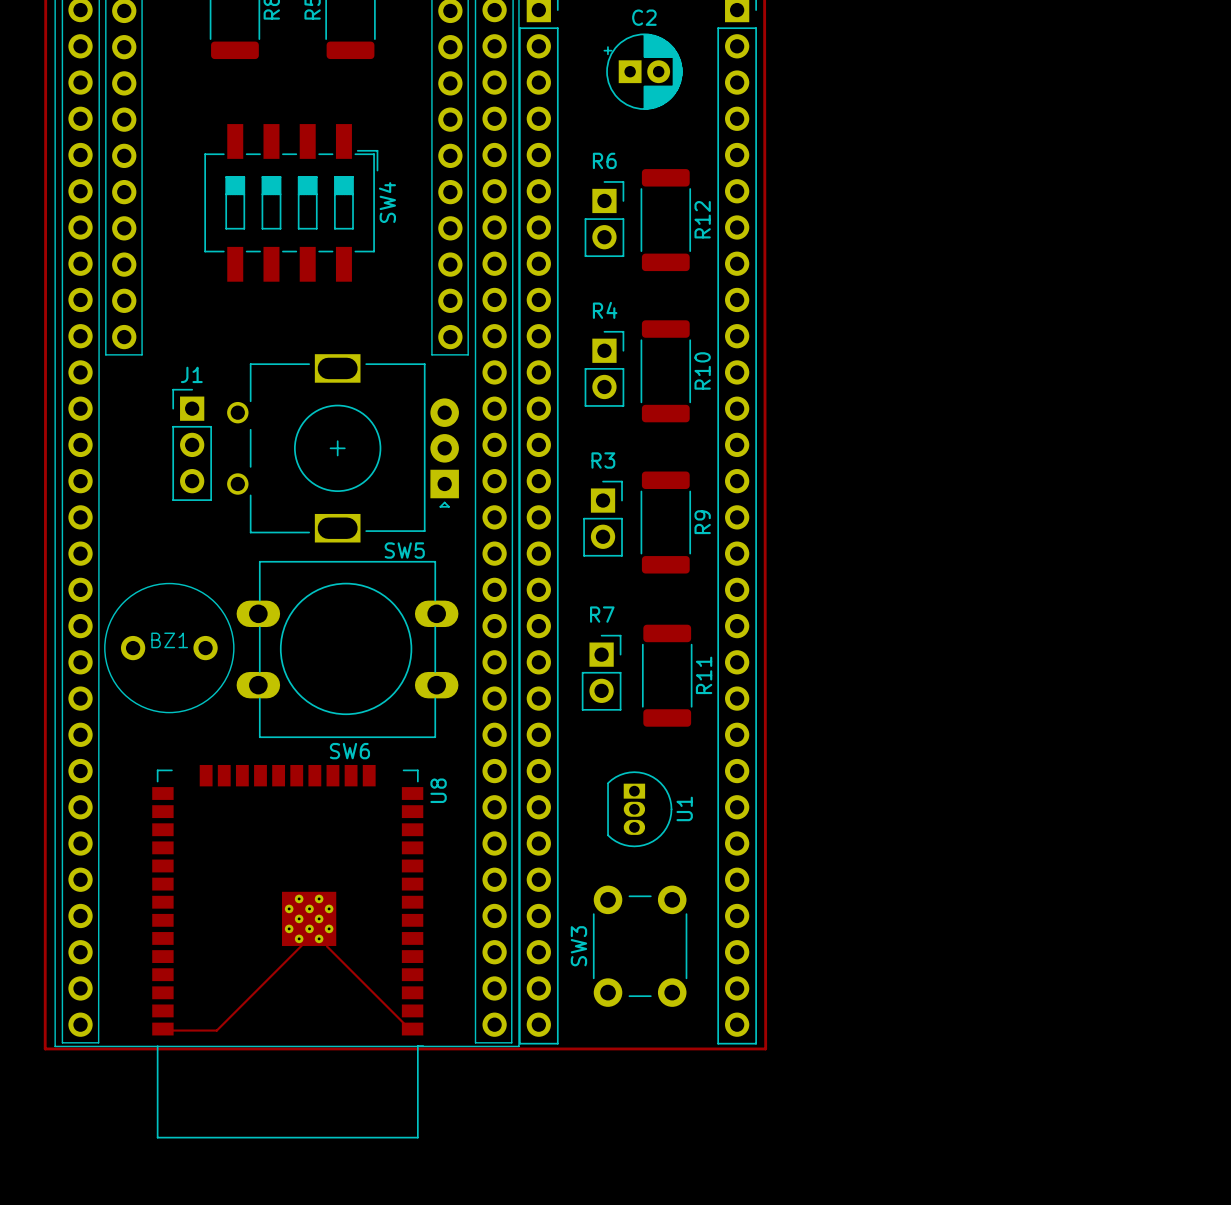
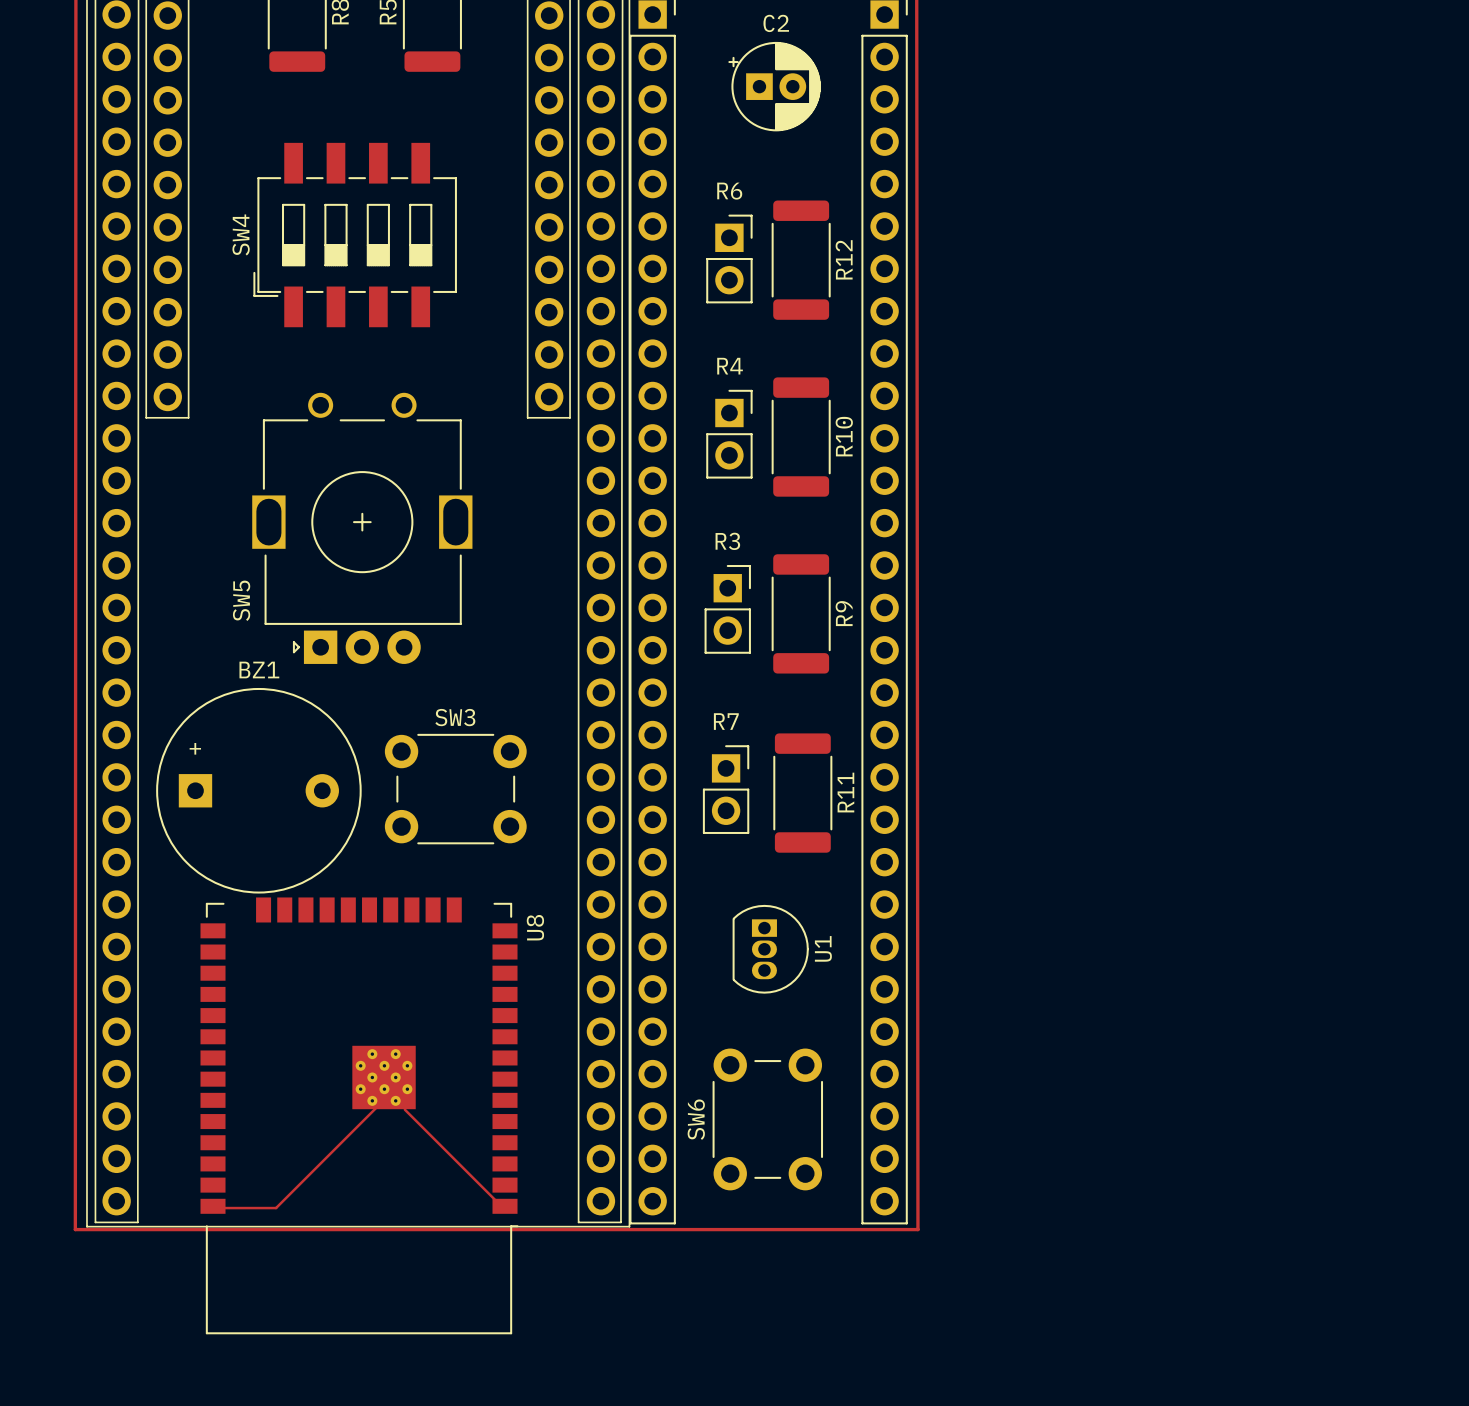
SW4 rotation: 0° (291, 202) -> 180° (355, 235)
J1: (192, 444) -> none
SW5 rotation: 0° (343, 448) -> 90° clockwise (362, 528)
SW6 footprint: [236, 560, 459, 739] -> [712, 1048, 824, 1191]
BZ1 footprint: [104, 582, 235, 714] -> [156, 687, 362, 894]
BZ1 name position: BZ1 (169, 640) -> BZ1 (259, 670)
SW6 name position: SW6 (349, 751) -> SW6 (696, 1119)
SW3 rotation: 0° (640, 946) -> 90° clockwise (455, 789)
SW3 position: (640, 946) -> (455, 789)

